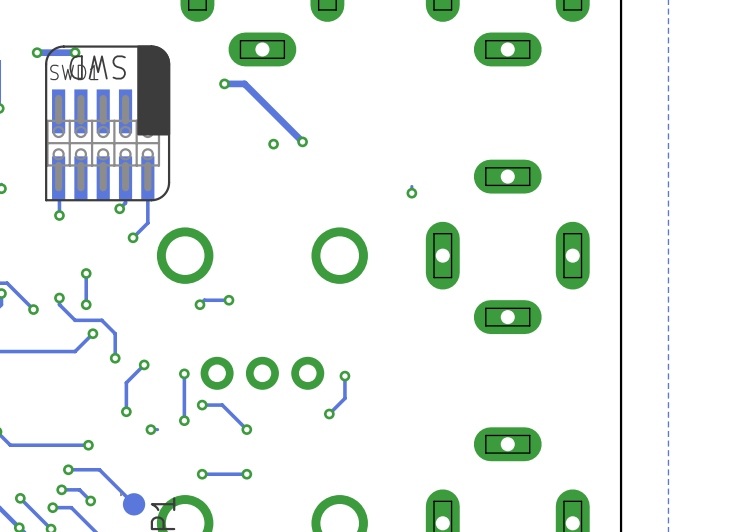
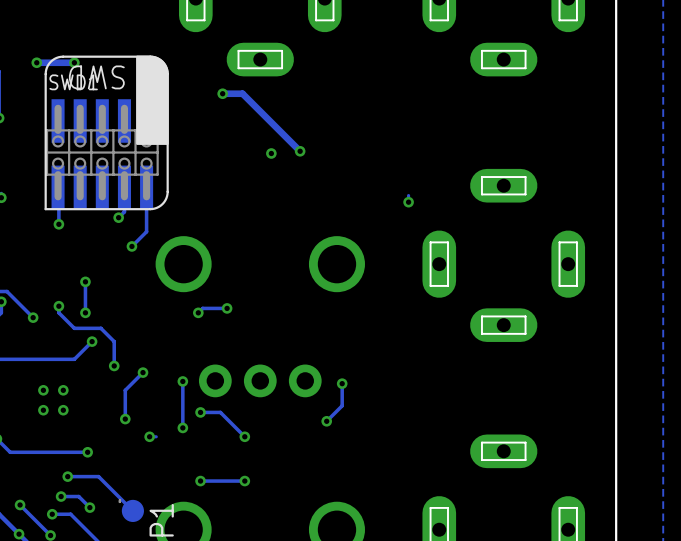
via: none -> (43, 390)
via: none -> (63, 390)
via: none -> (43, 410)
via: none -> (63, 410)

